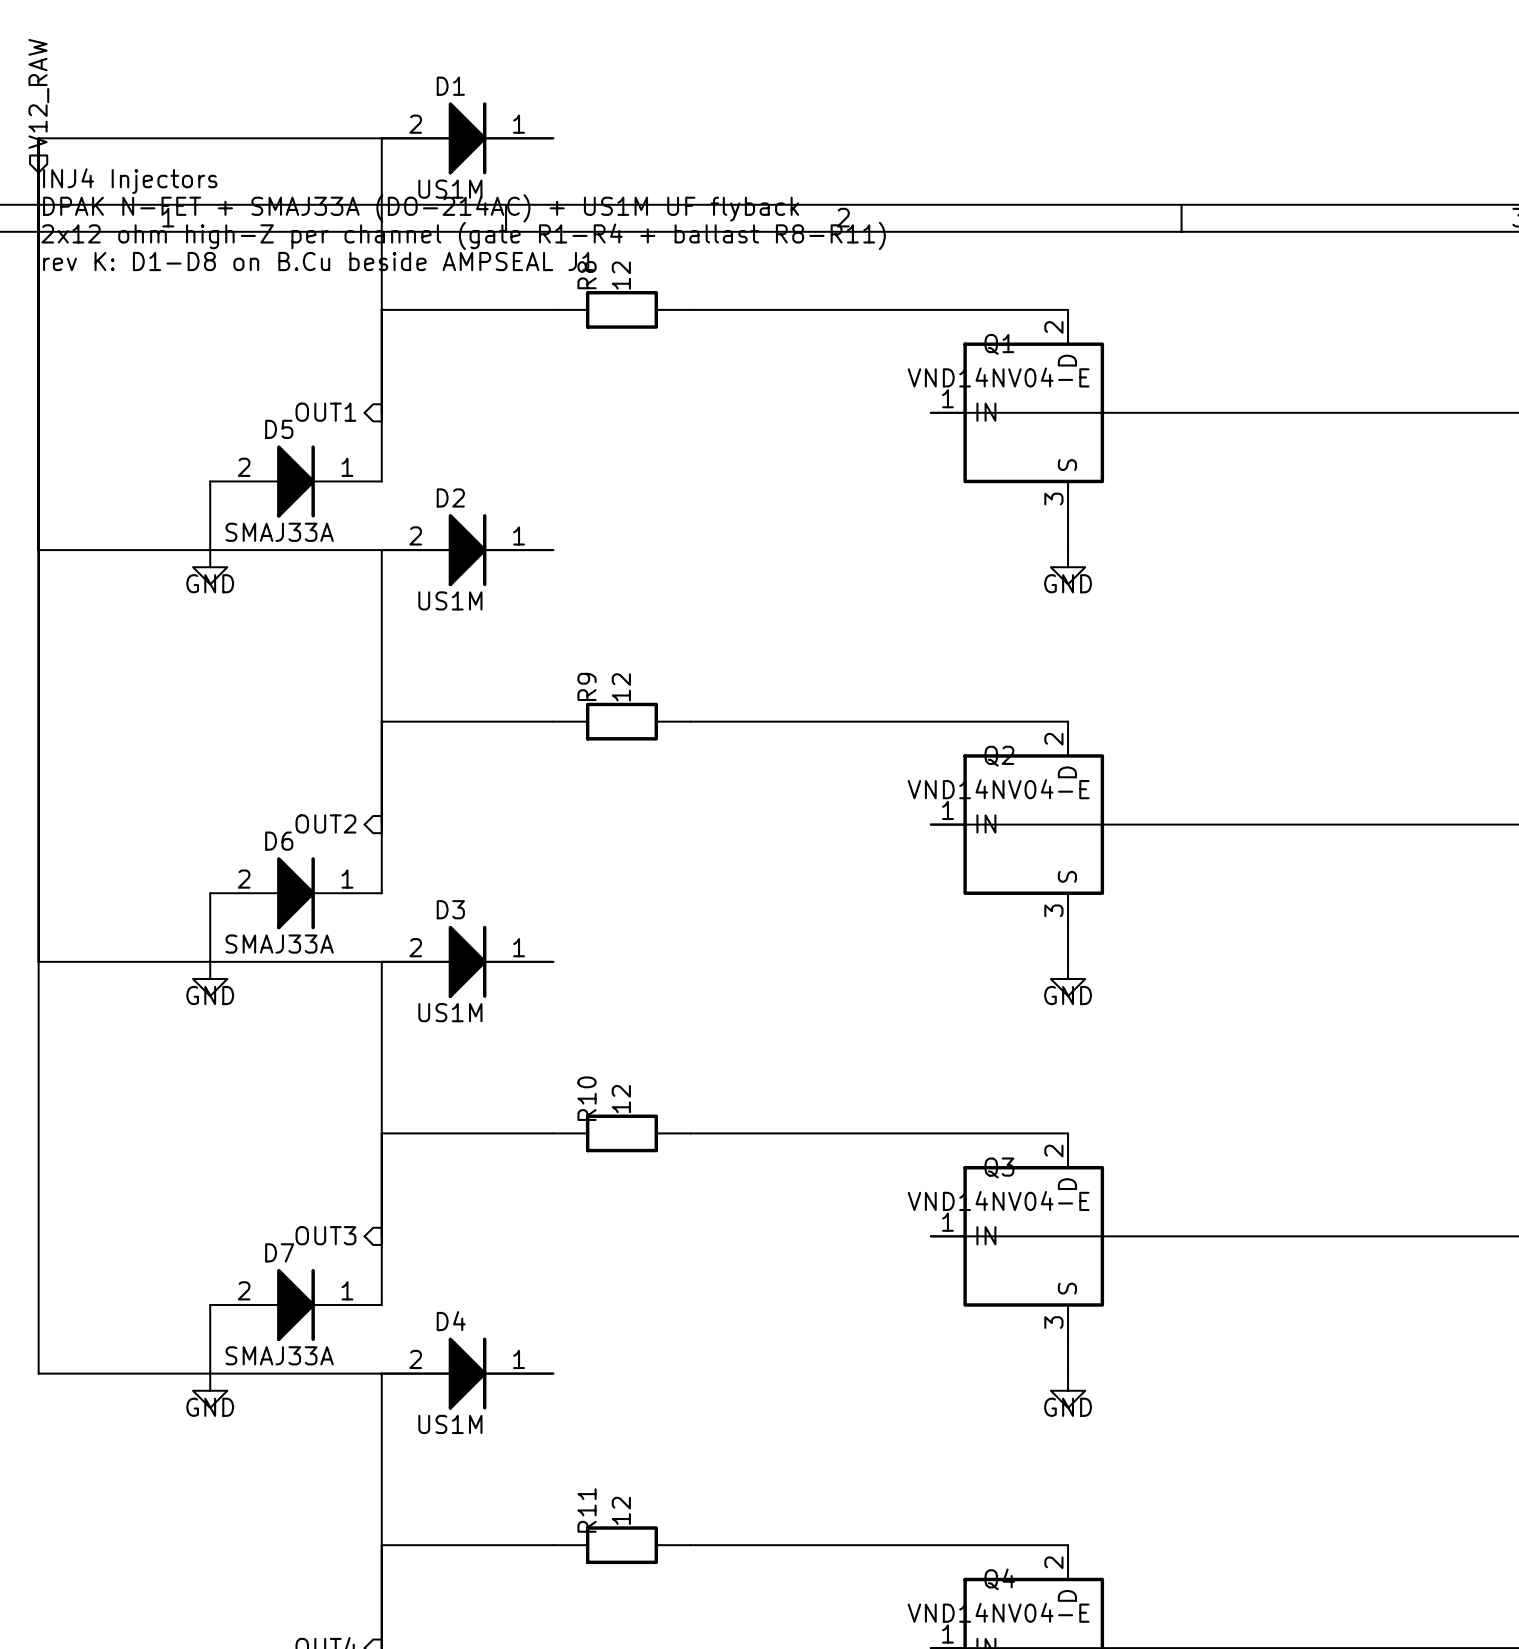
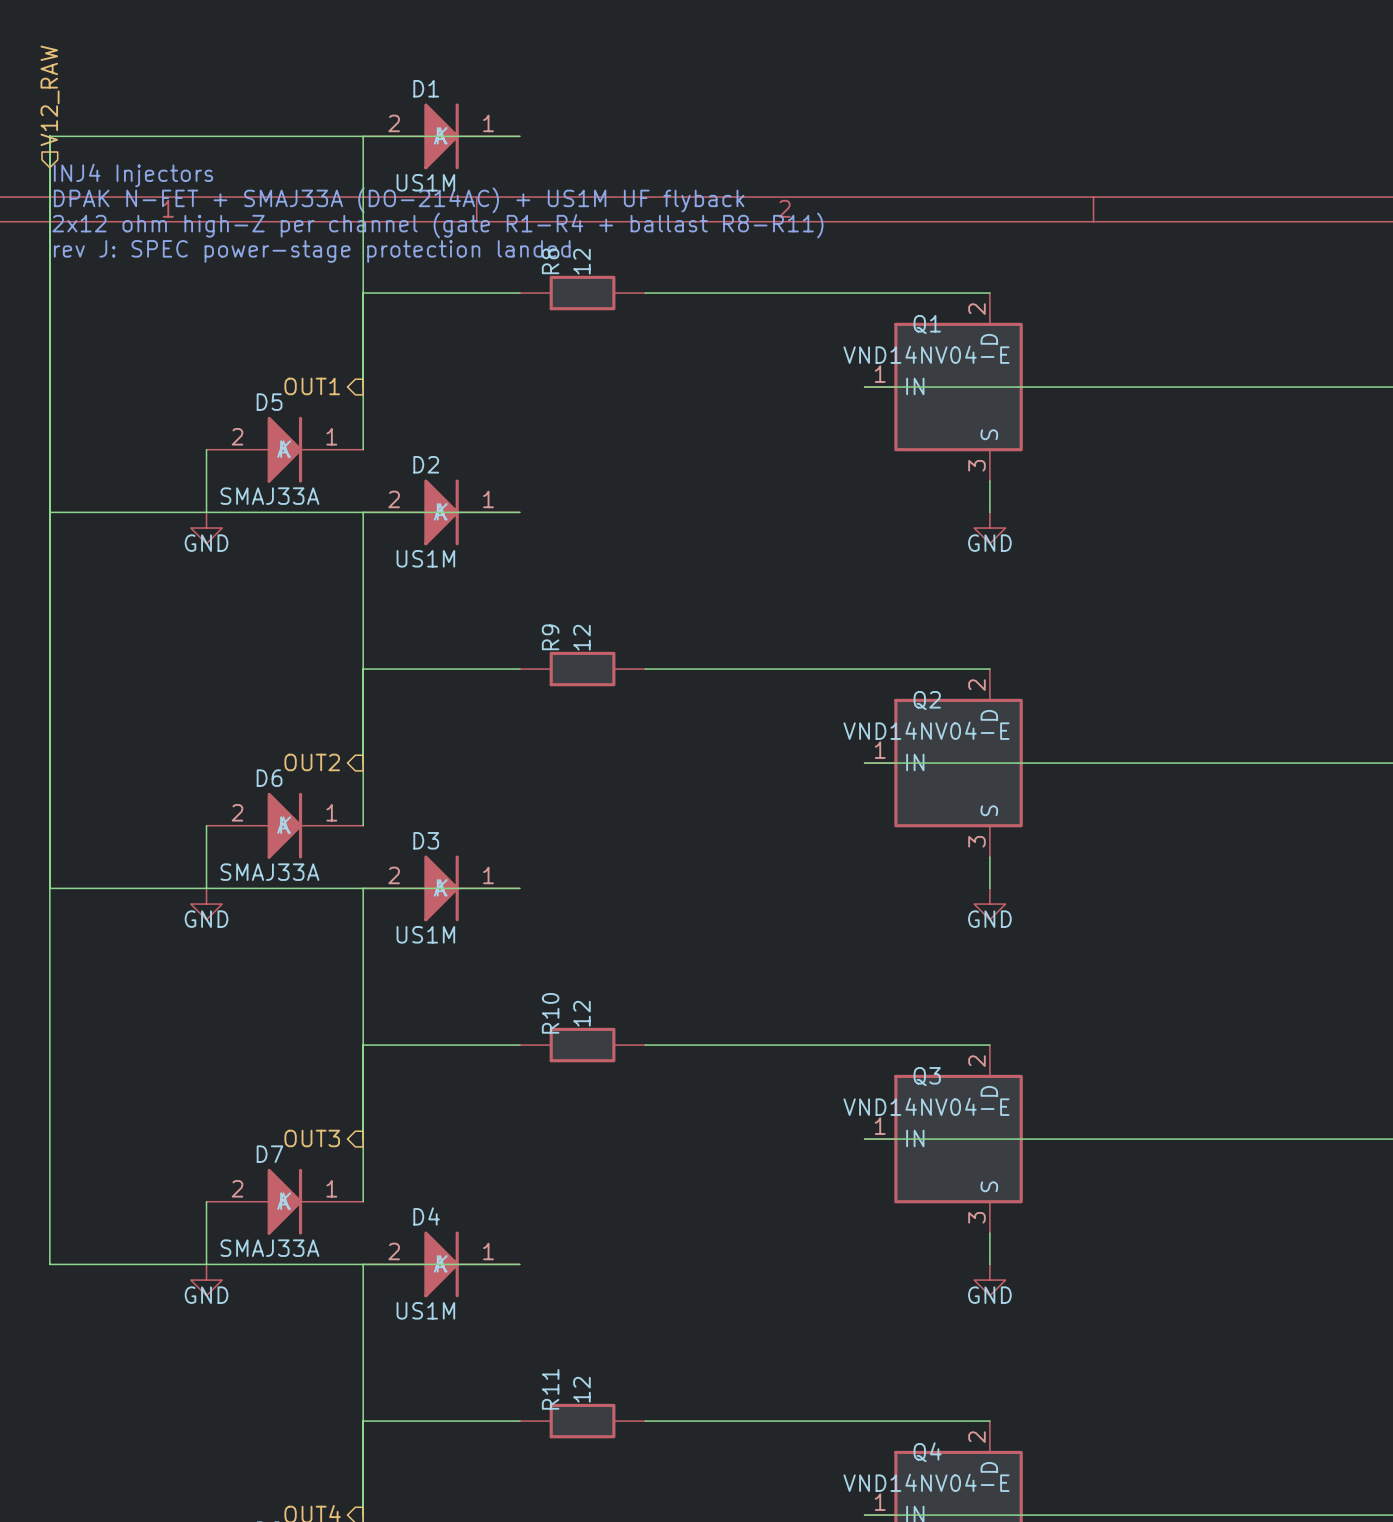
text: rev K: D1-D8 on B.Cu beside AMPSEAL J1 (318, 261) -> rev J: SPEC power-stage protection landed (312, 251)

